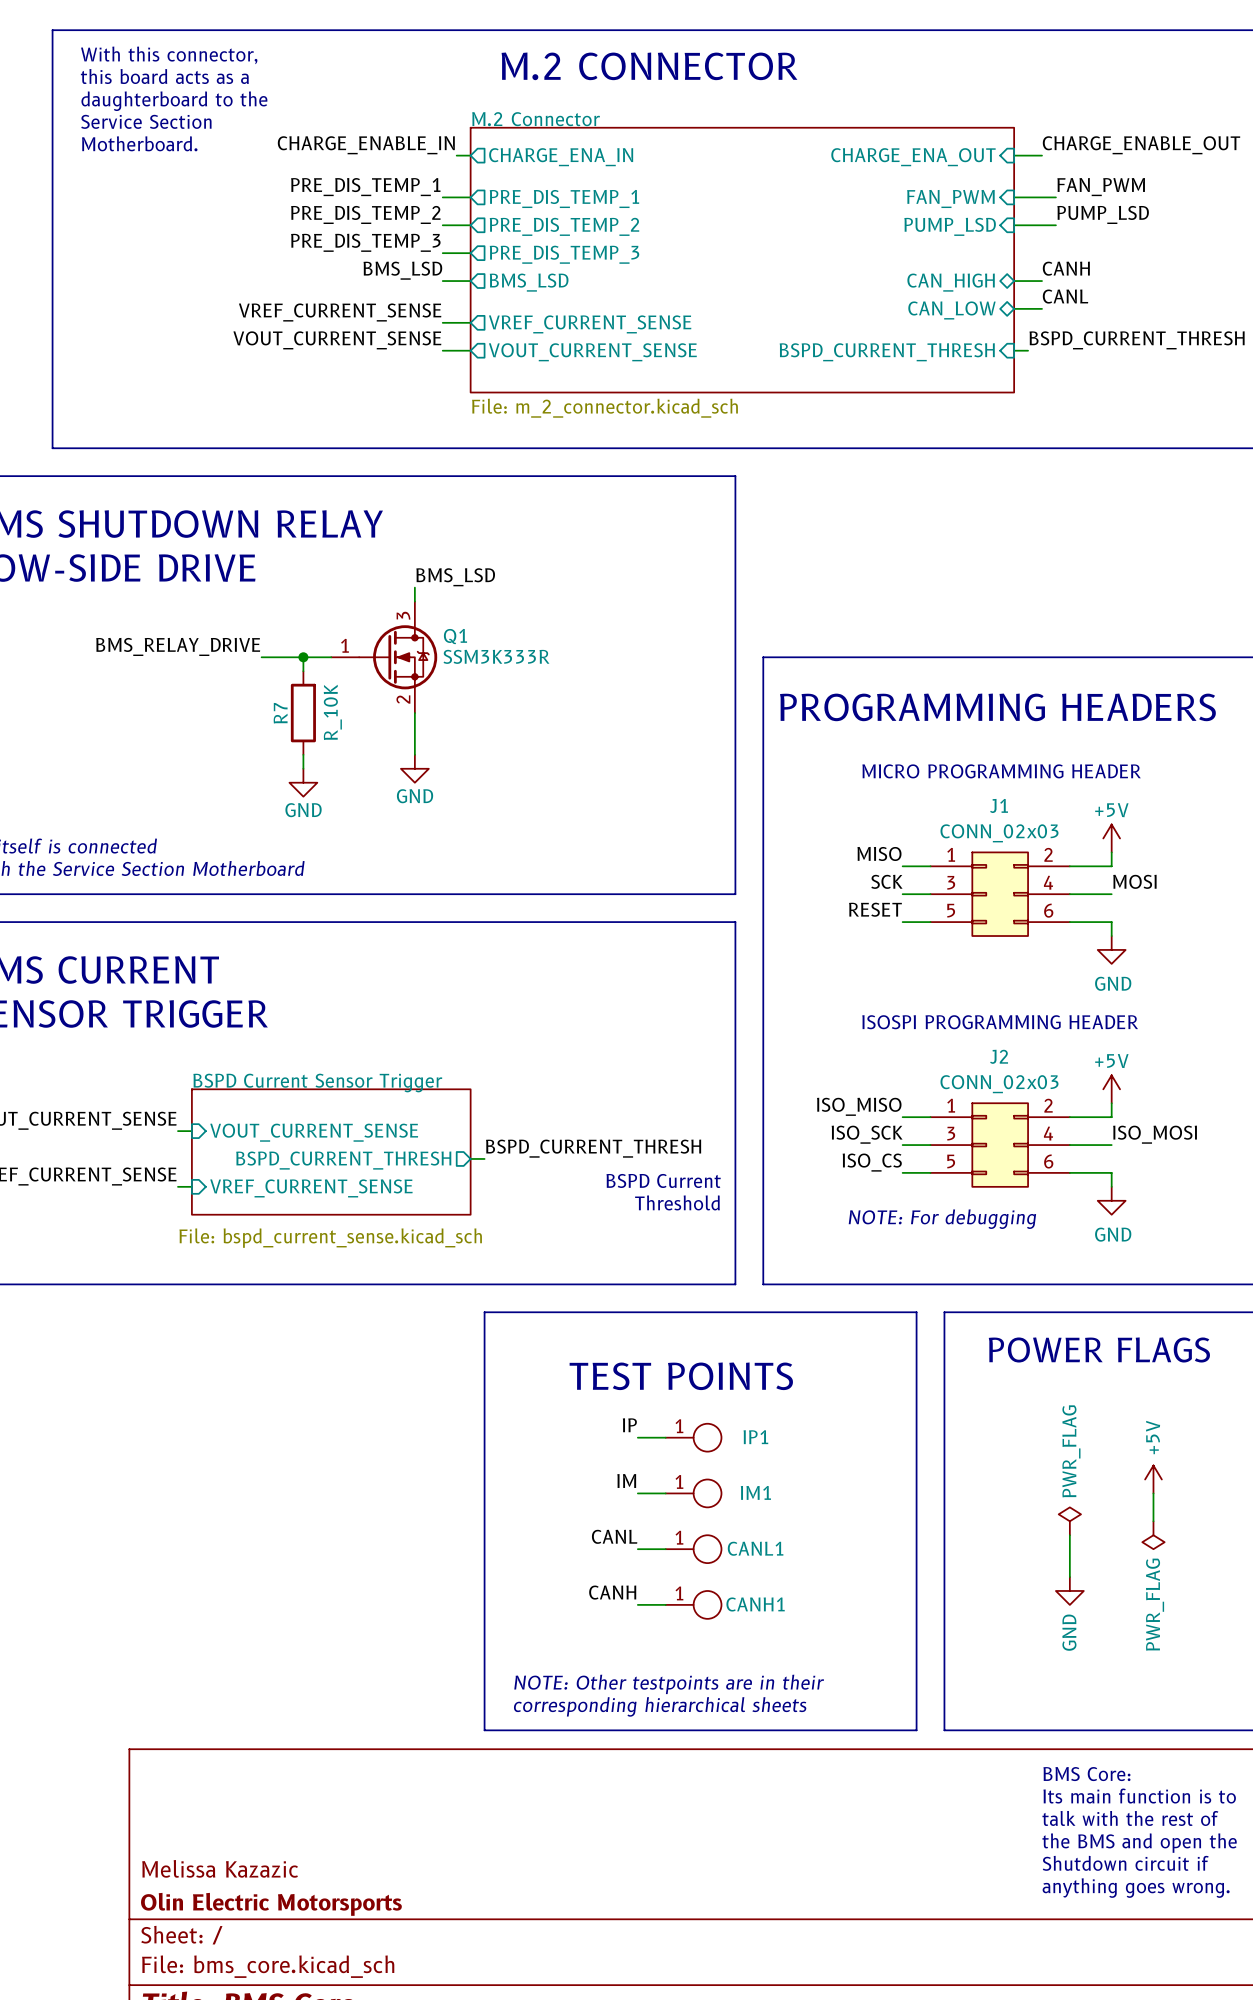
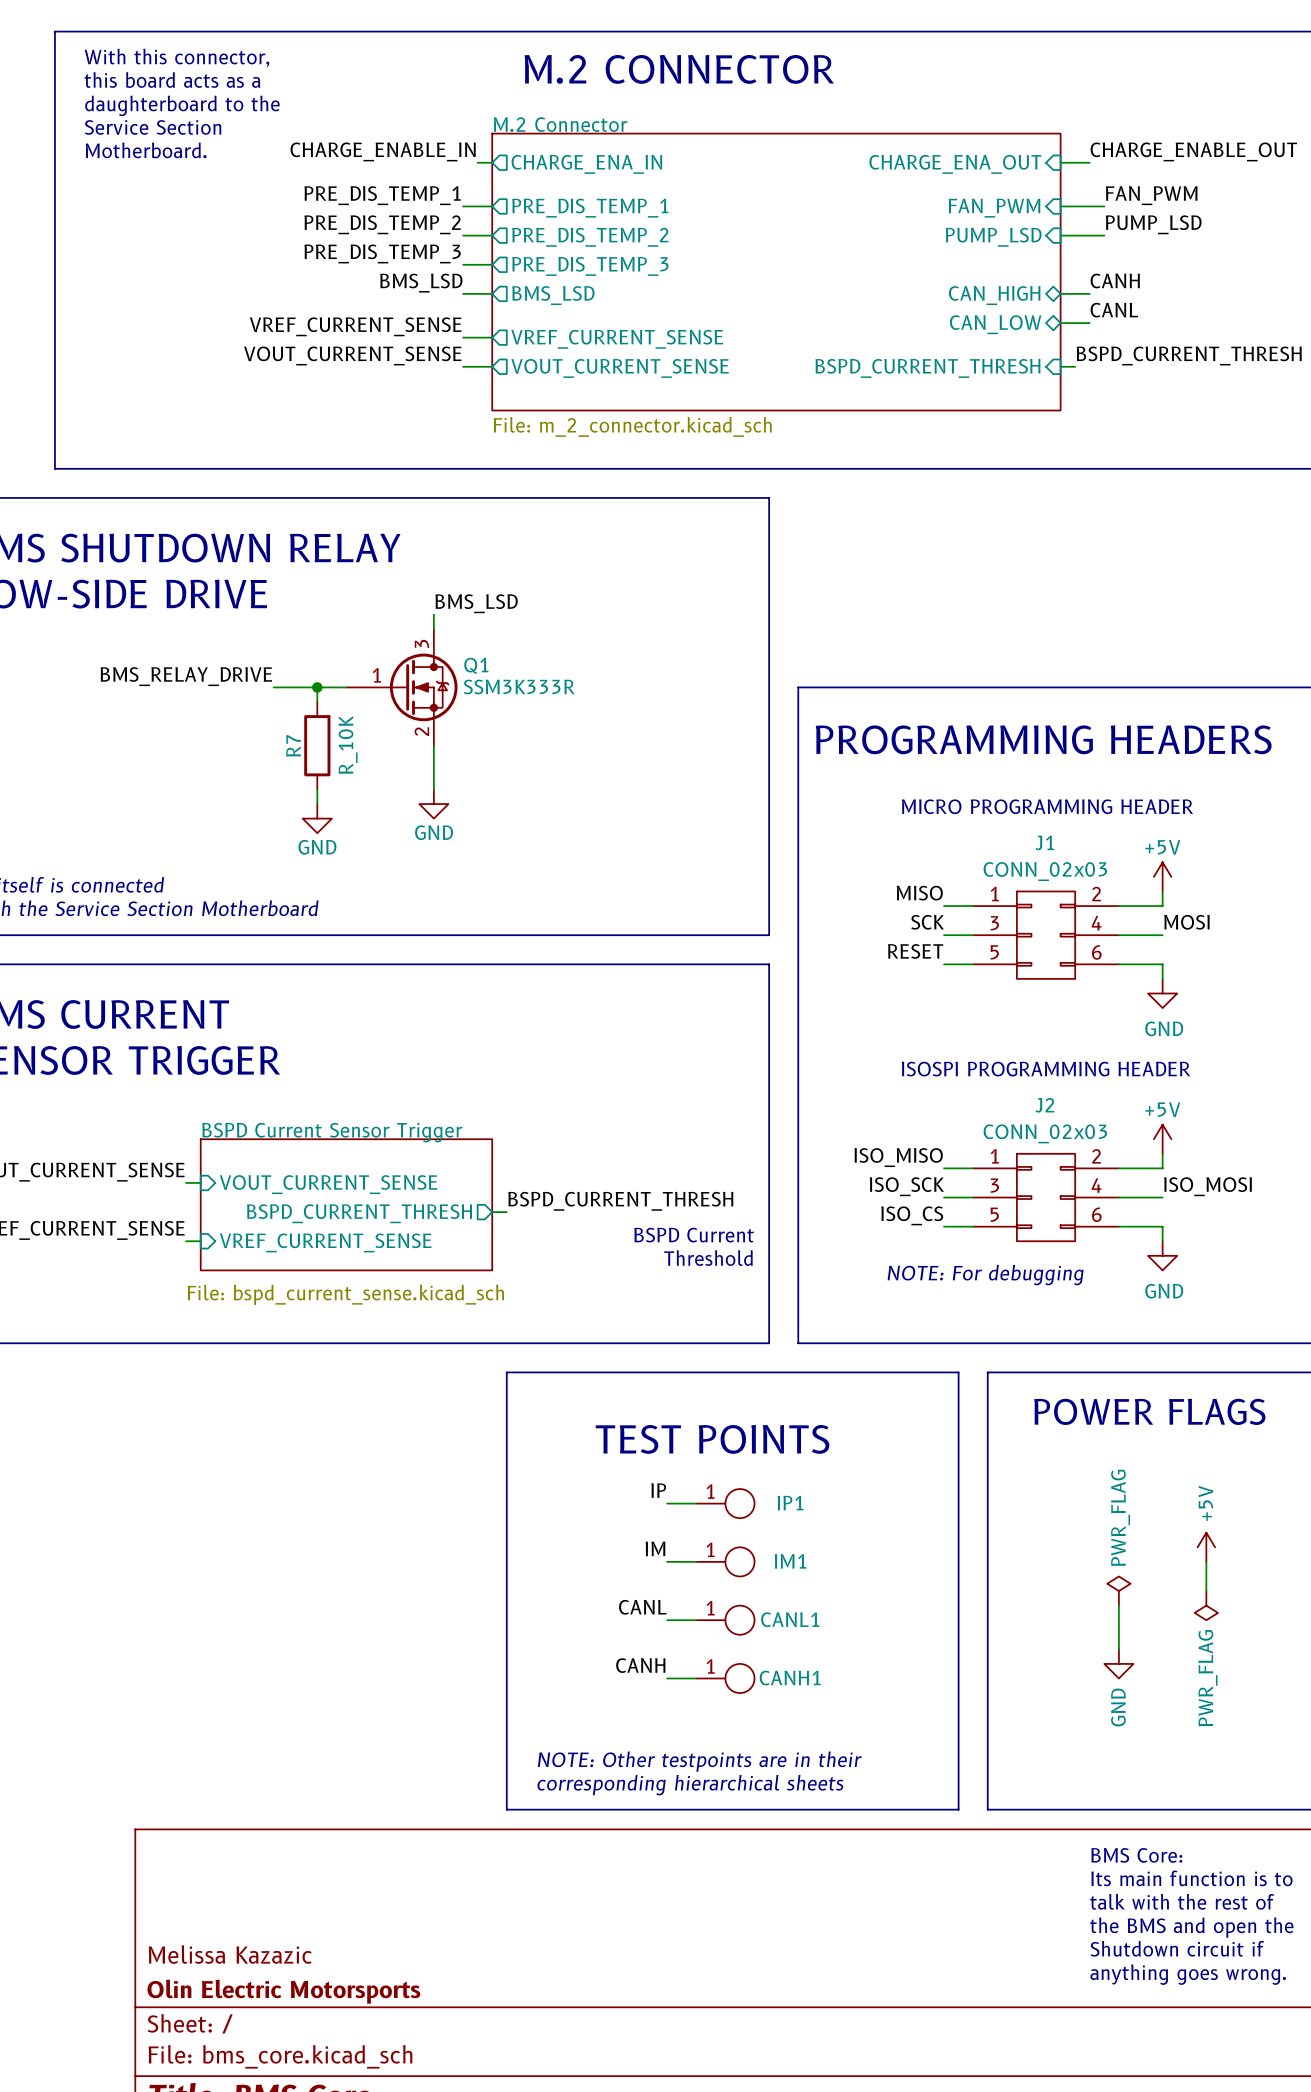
Q1 symbol: [331, 601, 438, 714] -> [346, 629, 458, 746]
J1 symbol: [930, 852, 1070, 937] -> [973, 891, 1119, 979]
J2 symbol: [930, 1103, 1070, 1187] -> [973, 1153, 1119, 1242]

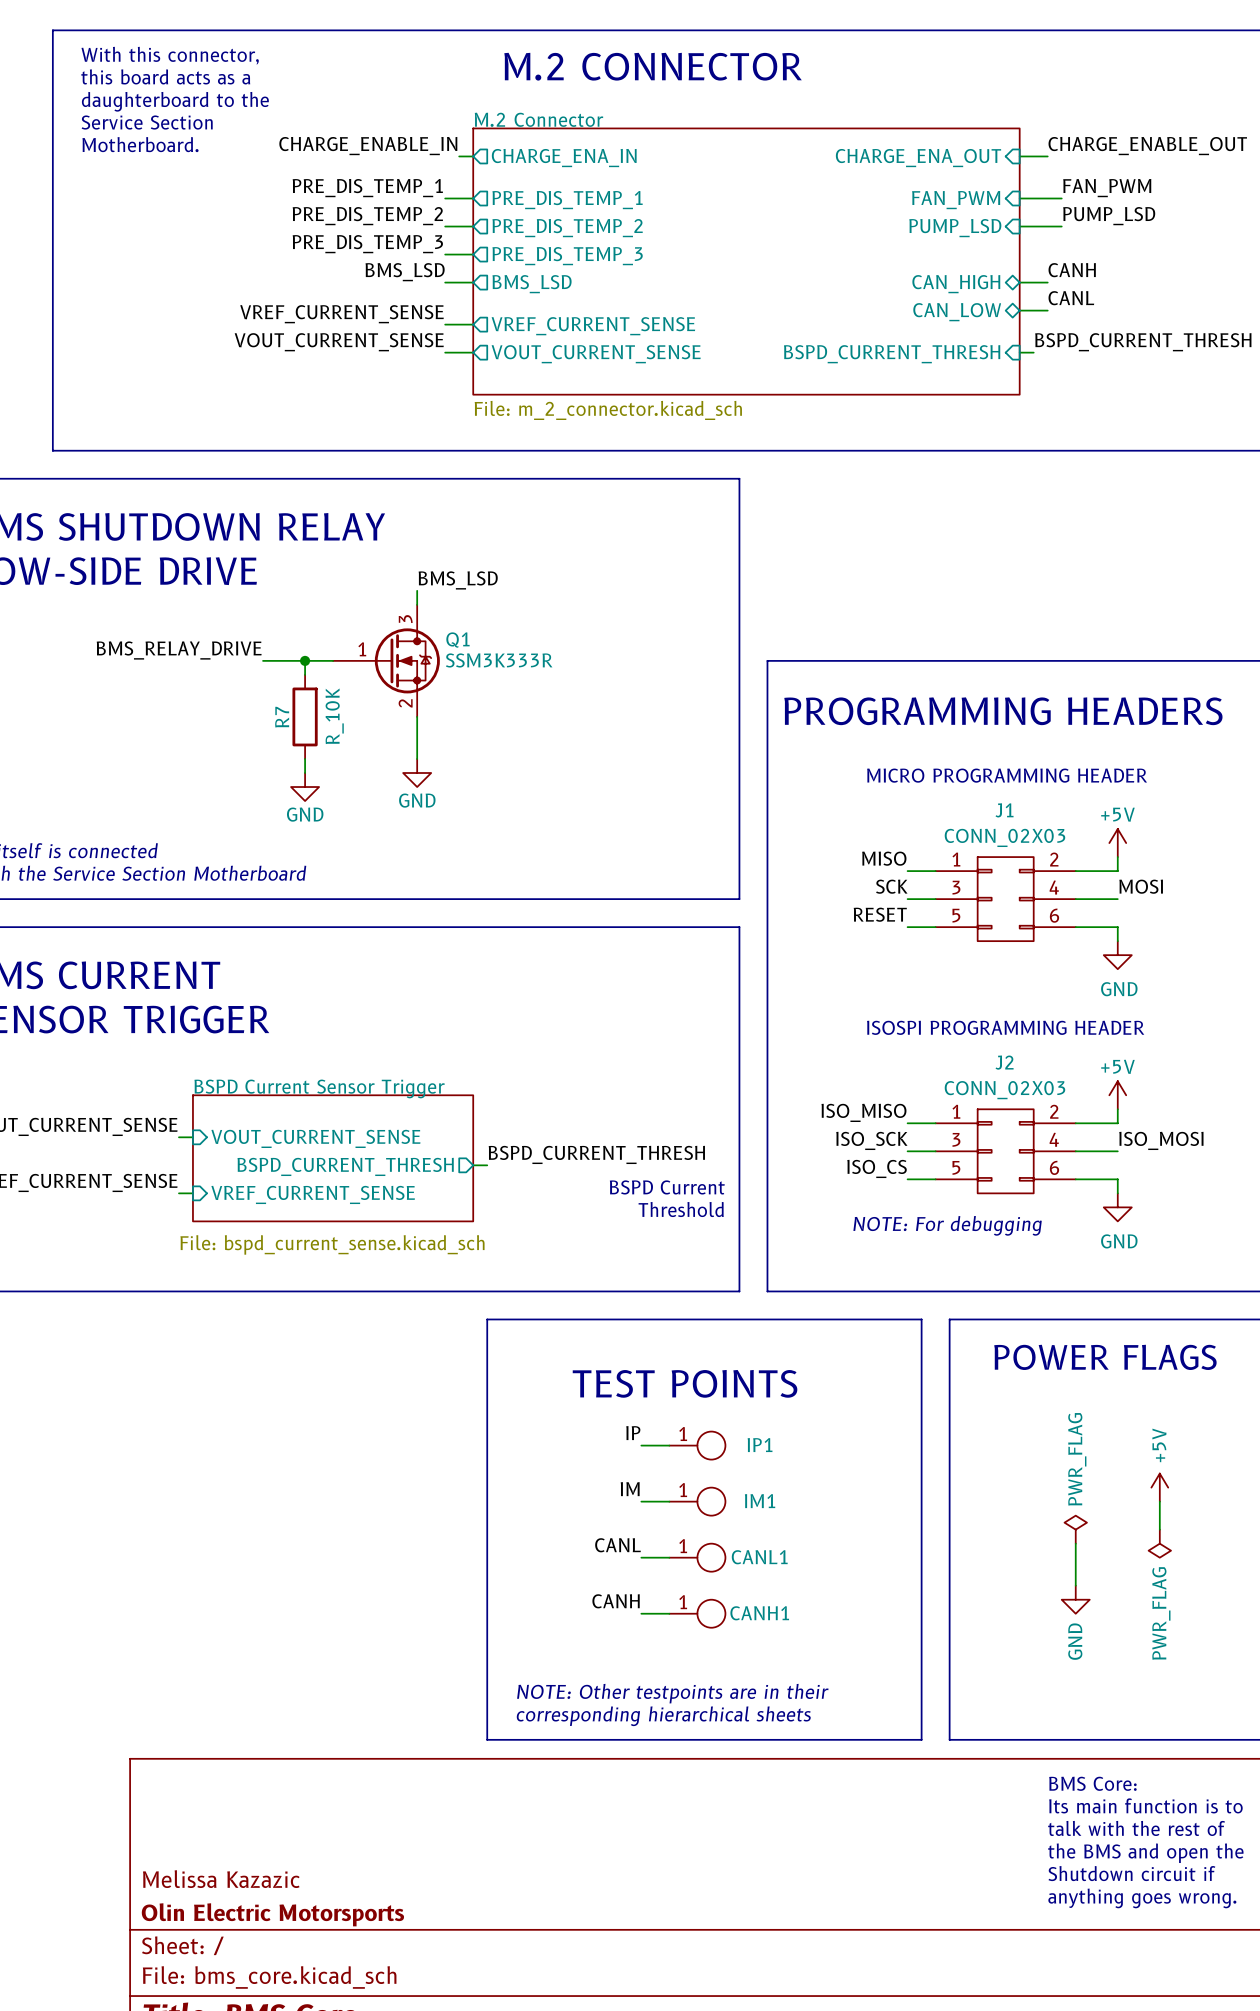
J1 value: CONN_02x03 (1045, 871) -> CONN_02X03 (1004, 837)
J2 value: CONN_02x03 (1045, 1133) -> CONN_02X03 (1004, 1090)

